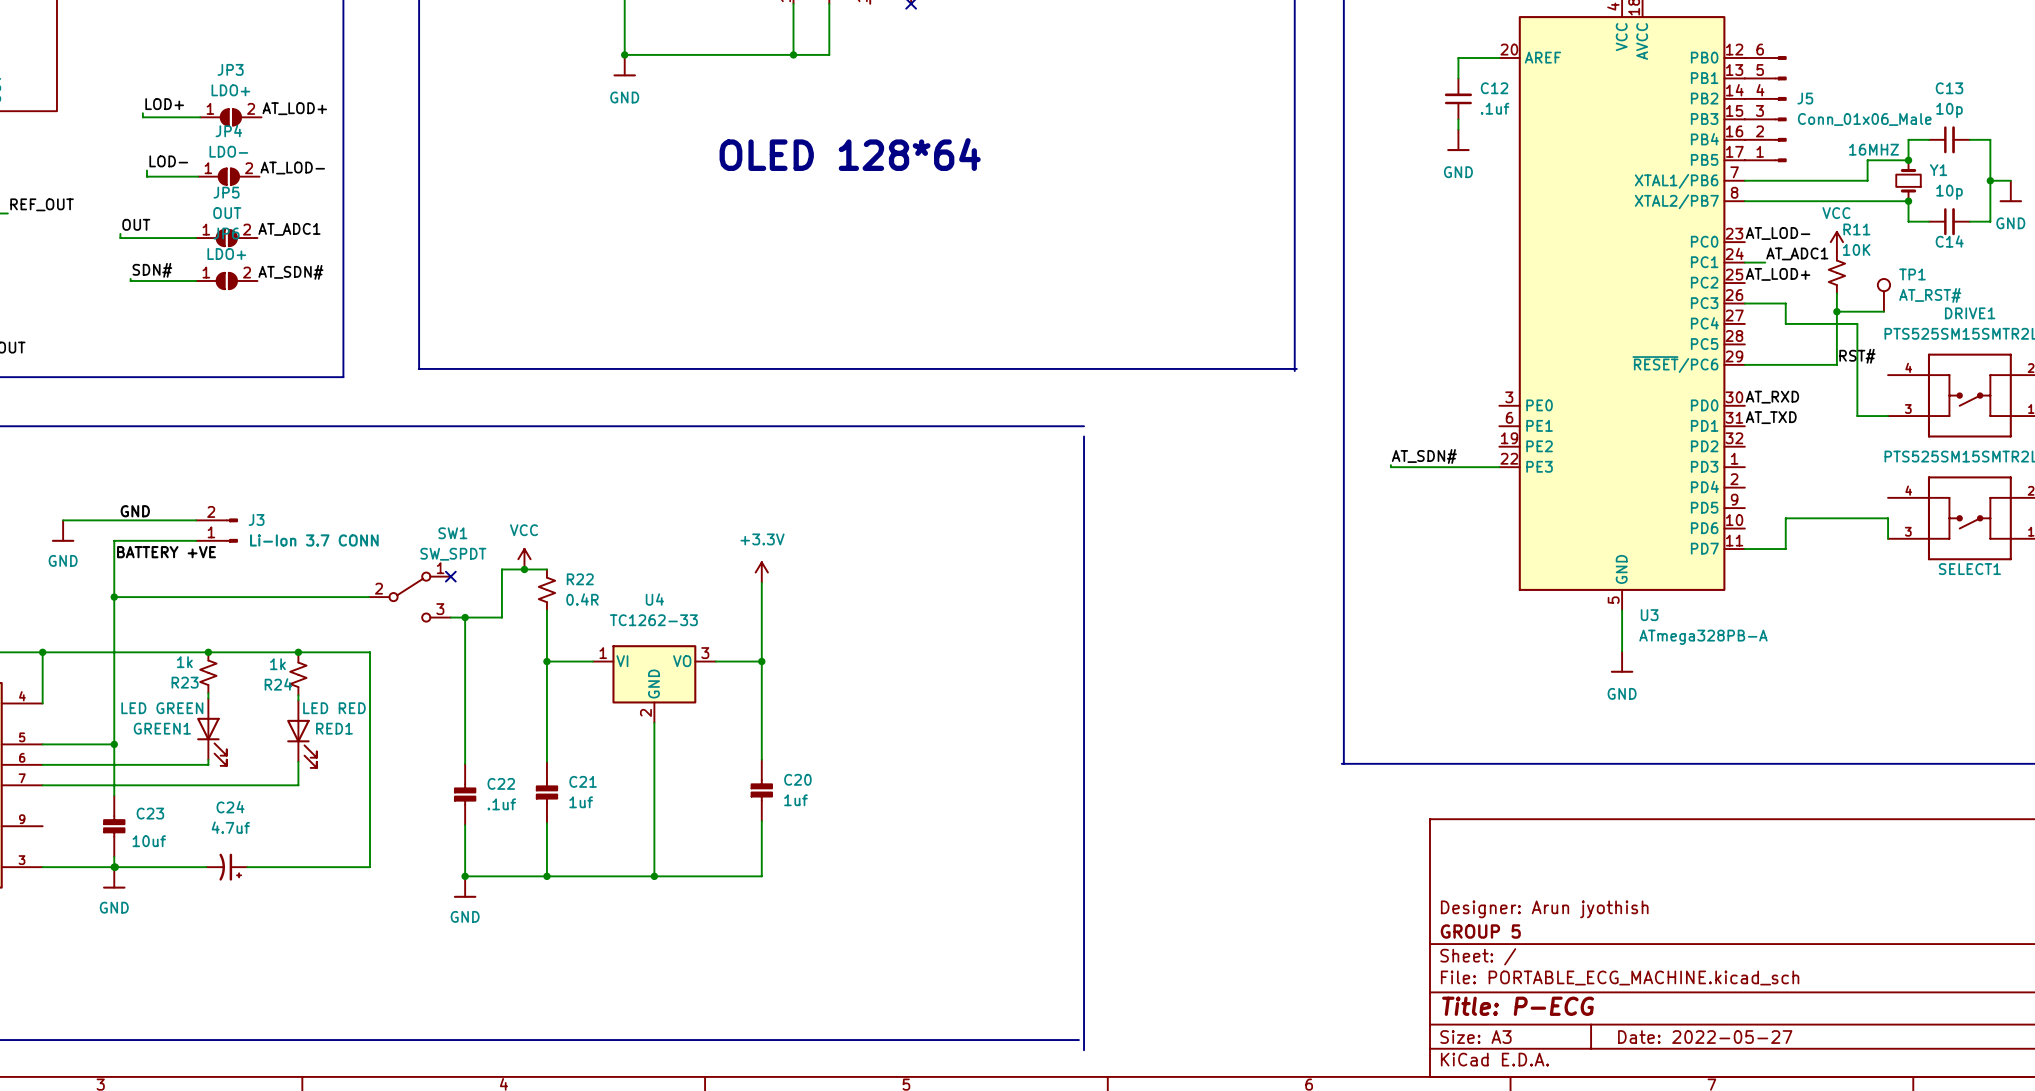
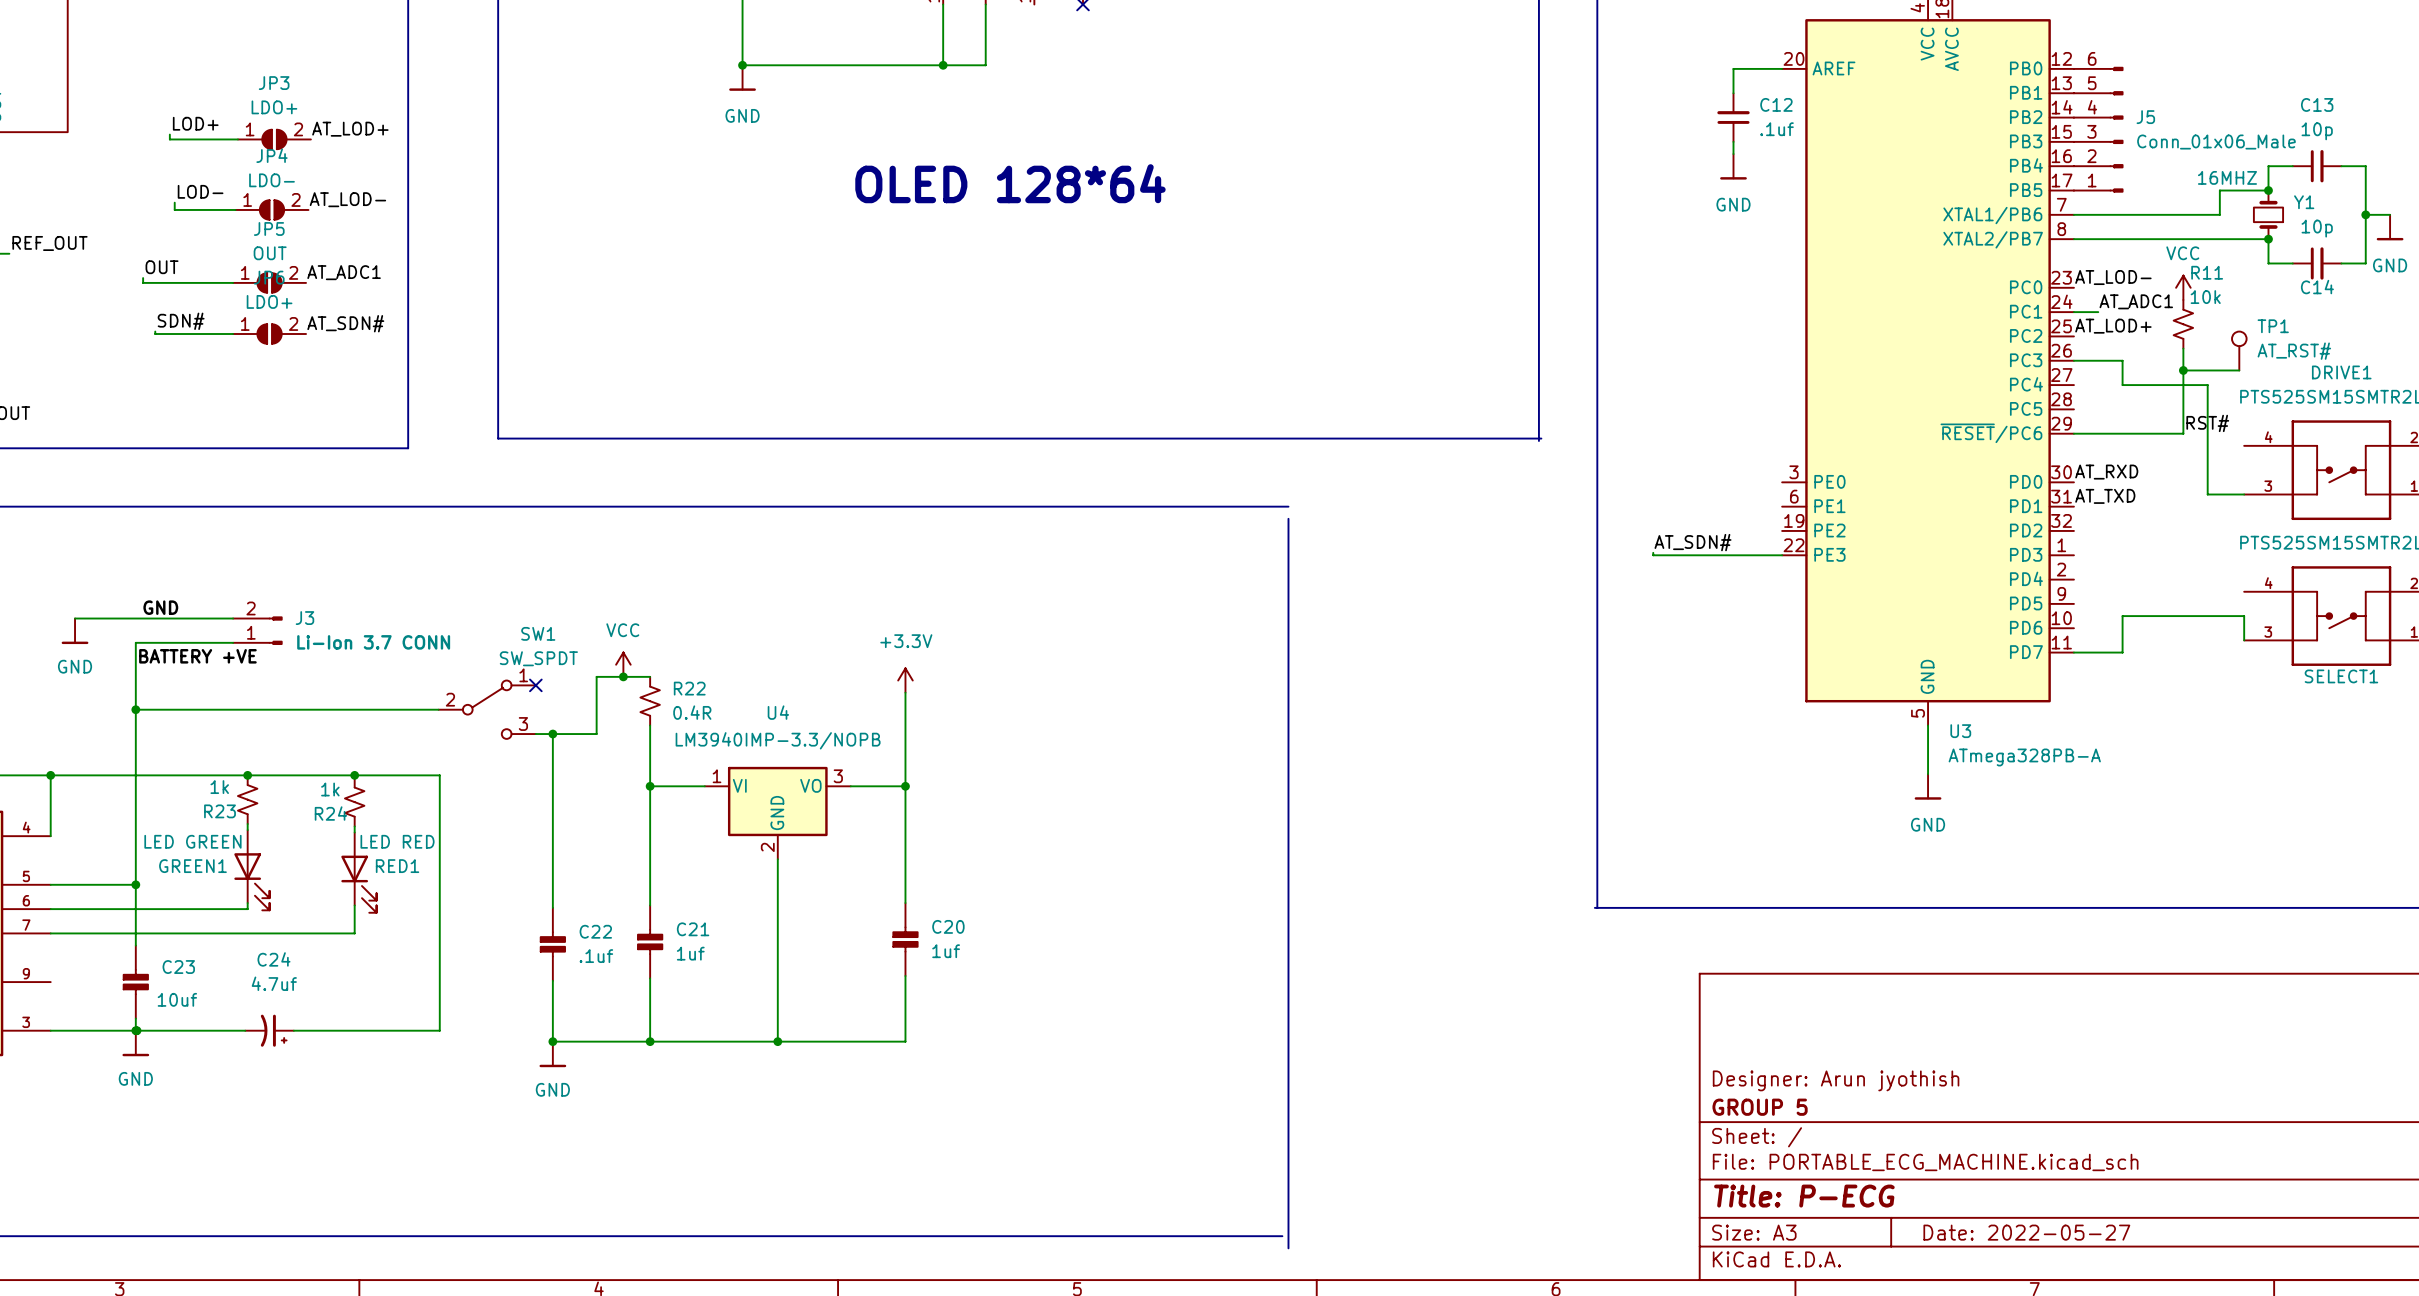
R11 value: 10K (1856, 249) -> 10k (2205, 297)
U4 value: TC1262-33 (653, 620) -> LM3940IMP-3.3/NOPB (778, 740)

